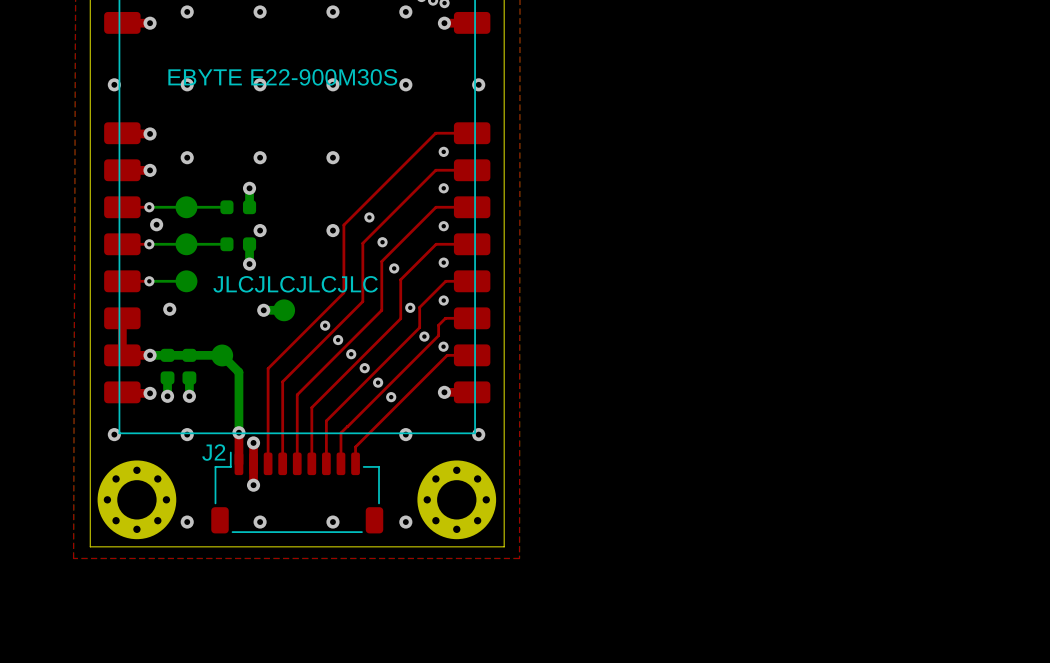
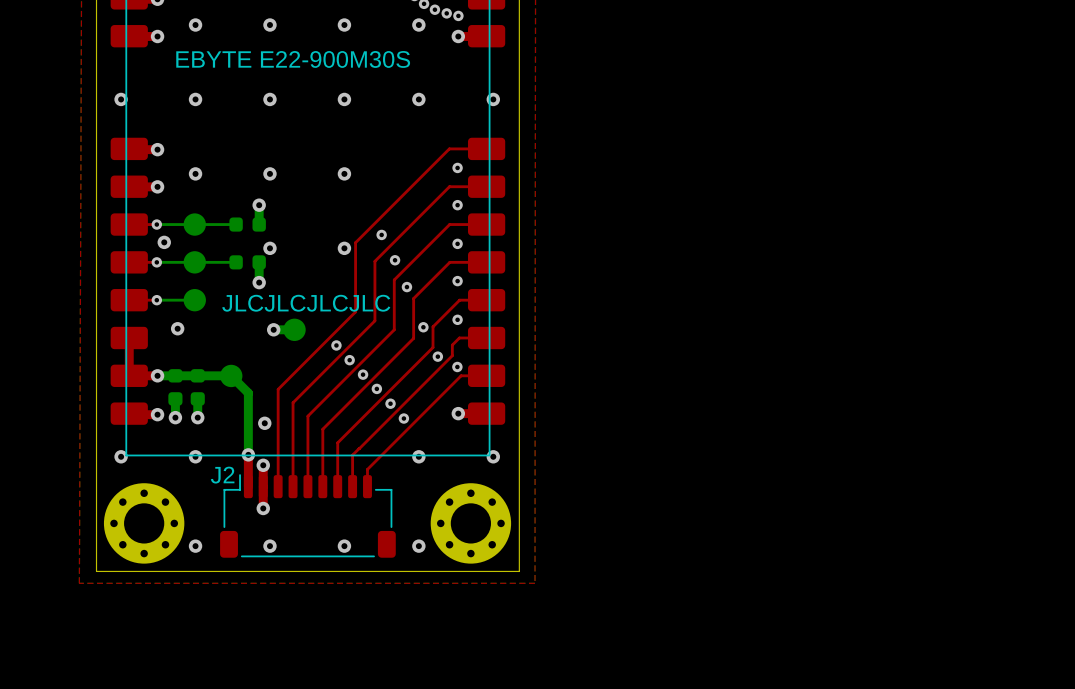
text position: EBYTE E22-900M30S (282, 77) -> EBYTE E22-900M30S (293, 59)
via: none -> (264, 423)

